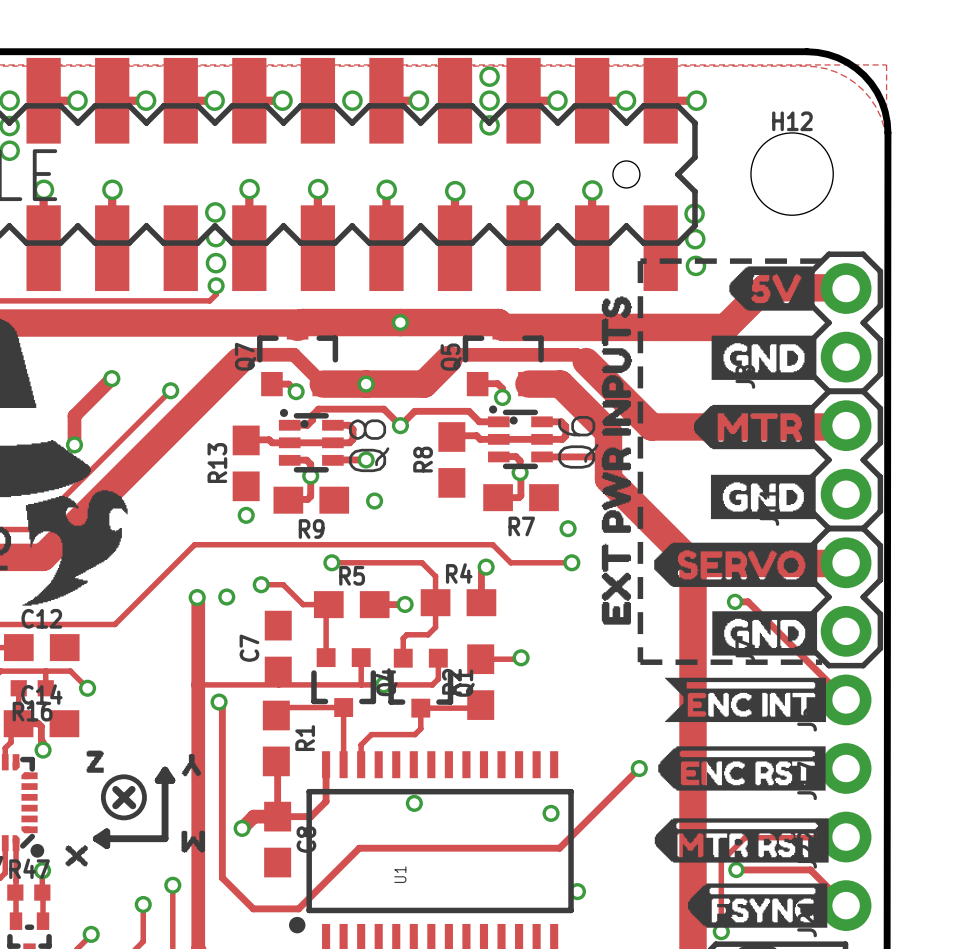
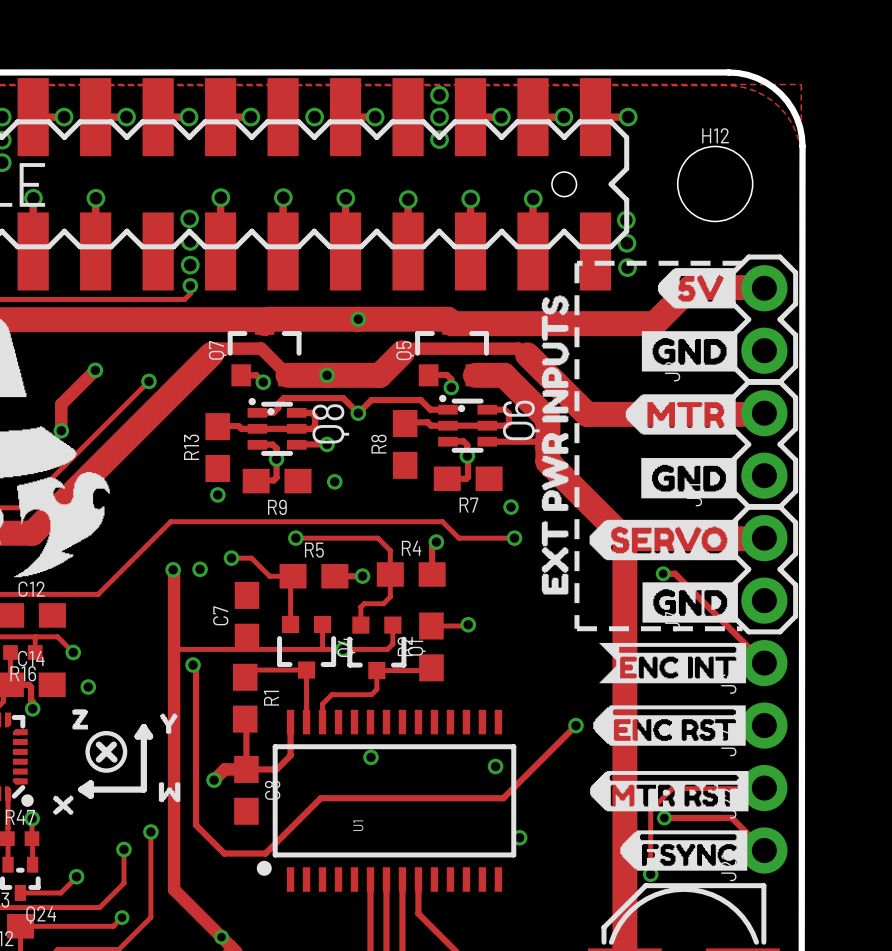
via: none -> (88, 687)
drawing shape: [181, 754, 202, 777] -> [160, 713, 178, 734]

